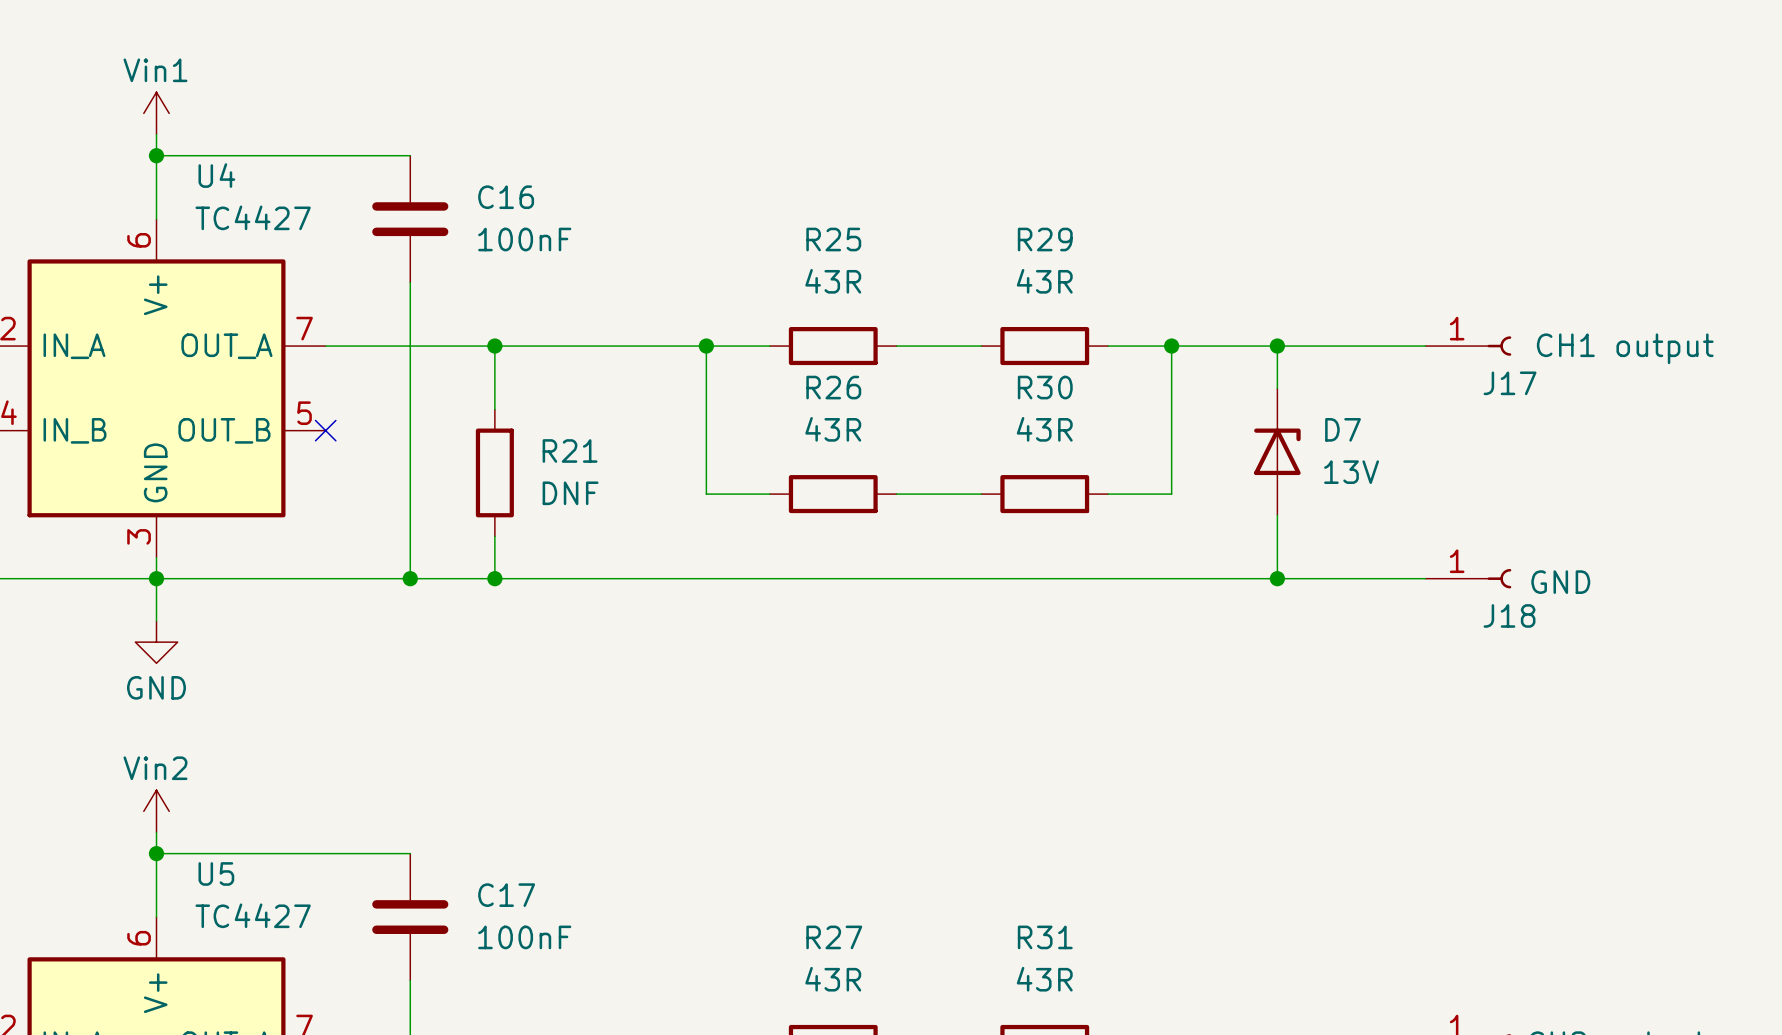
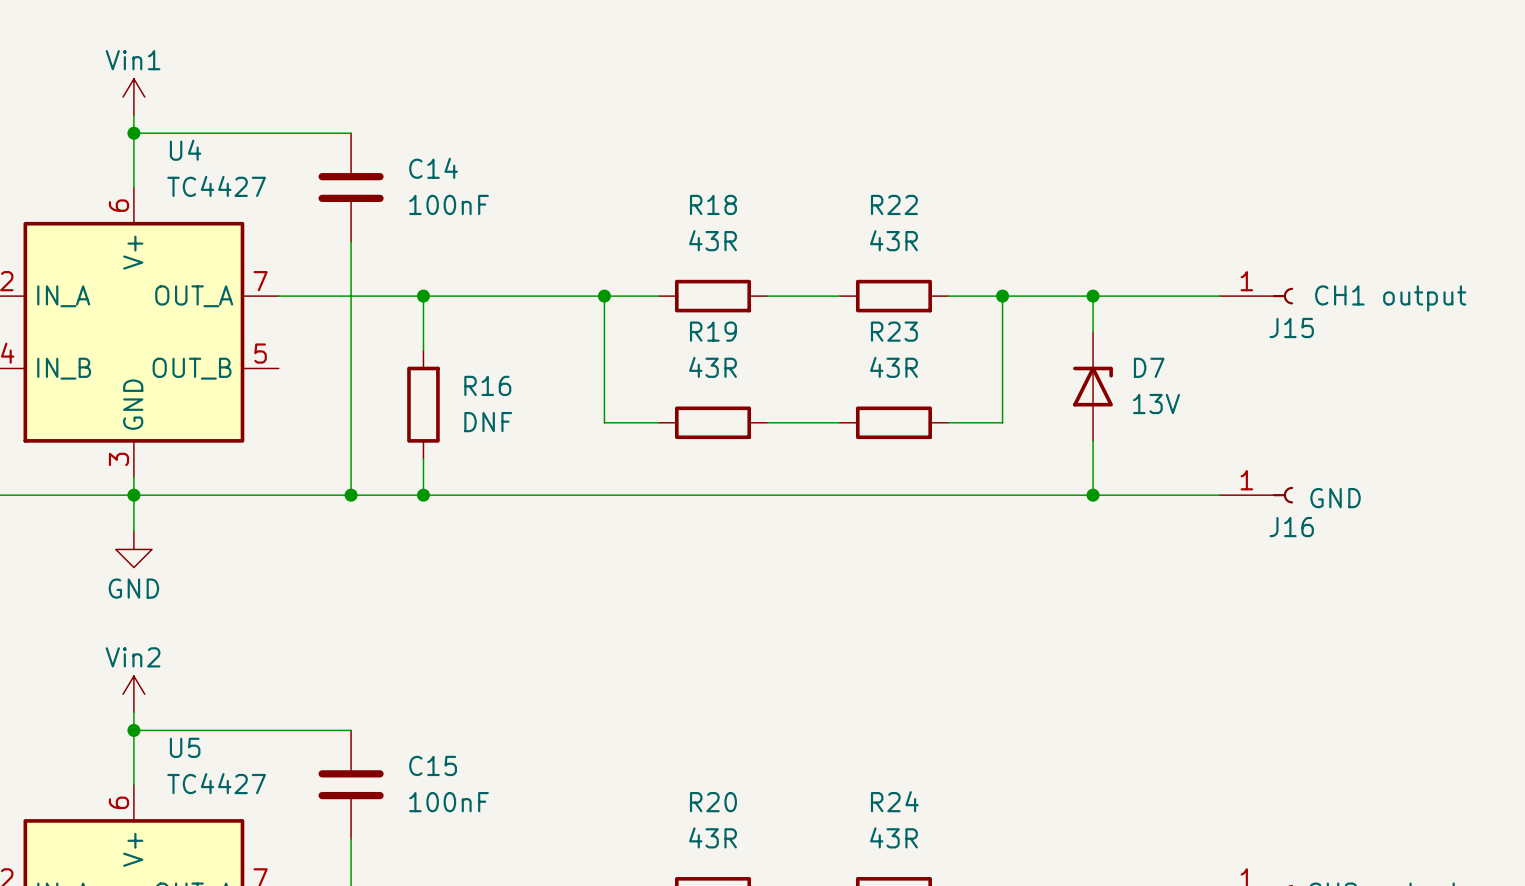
C16 name: C16 (506, 197) -> C14 (433, 168)
R25 name: R25 (833, 239) -> R18 (713, 204)
R29 name: R29 (1045, 239) -> R22 (894, 204)
J17 name: J17 (1510, 383) -> J15 (1291, 328)
R26 name: R26 (833, 387) -> R19 (713, 331)
R30 name: R30 (1045, 387) -> R23 (894, 331)
no-connect mark: (325, 430) -> none
R21 name: R21 (570, 450) -> R16 (487, 385)
J18 name: J18 (1509, 615) -> J16 (1291, 527)
C17 name: C17 (506, 895) -> C15 (433, 765)
R27 name: R27 (834, 937) -> R20 (713, 802)
R31 name: R31 (1045, 937) -> R24 (894, 801)

